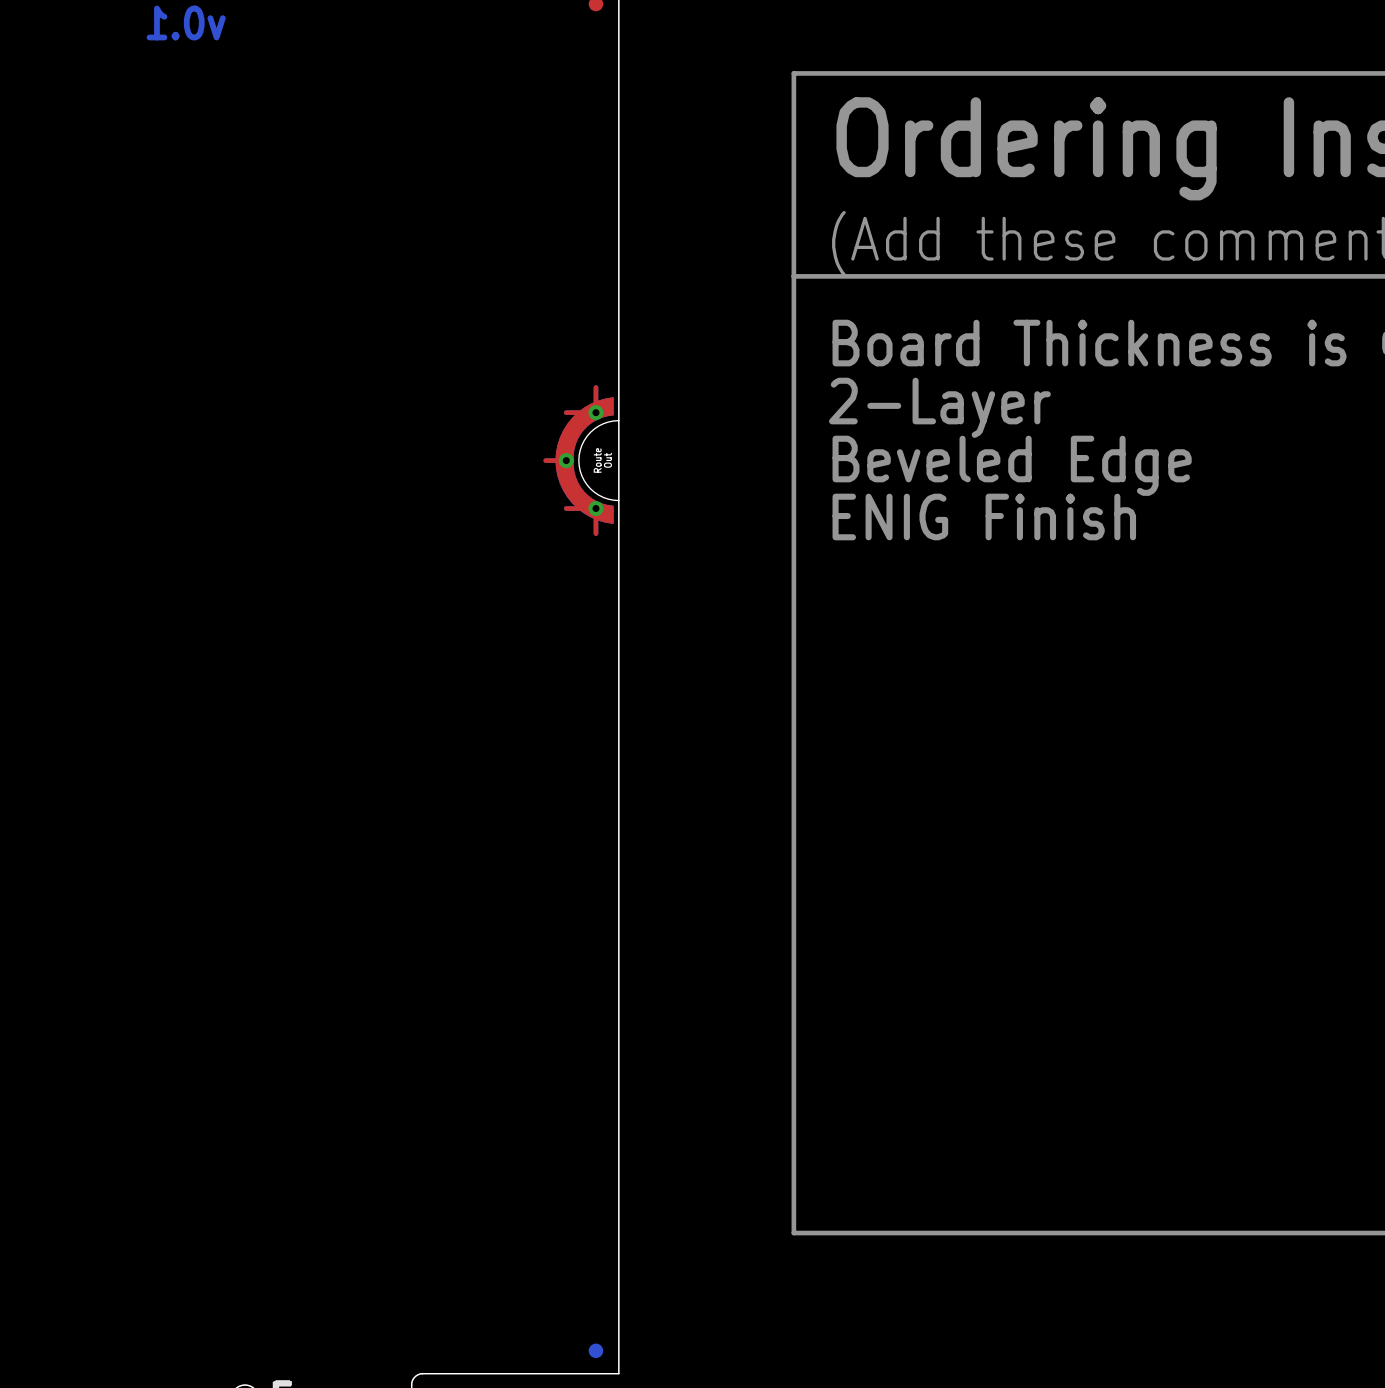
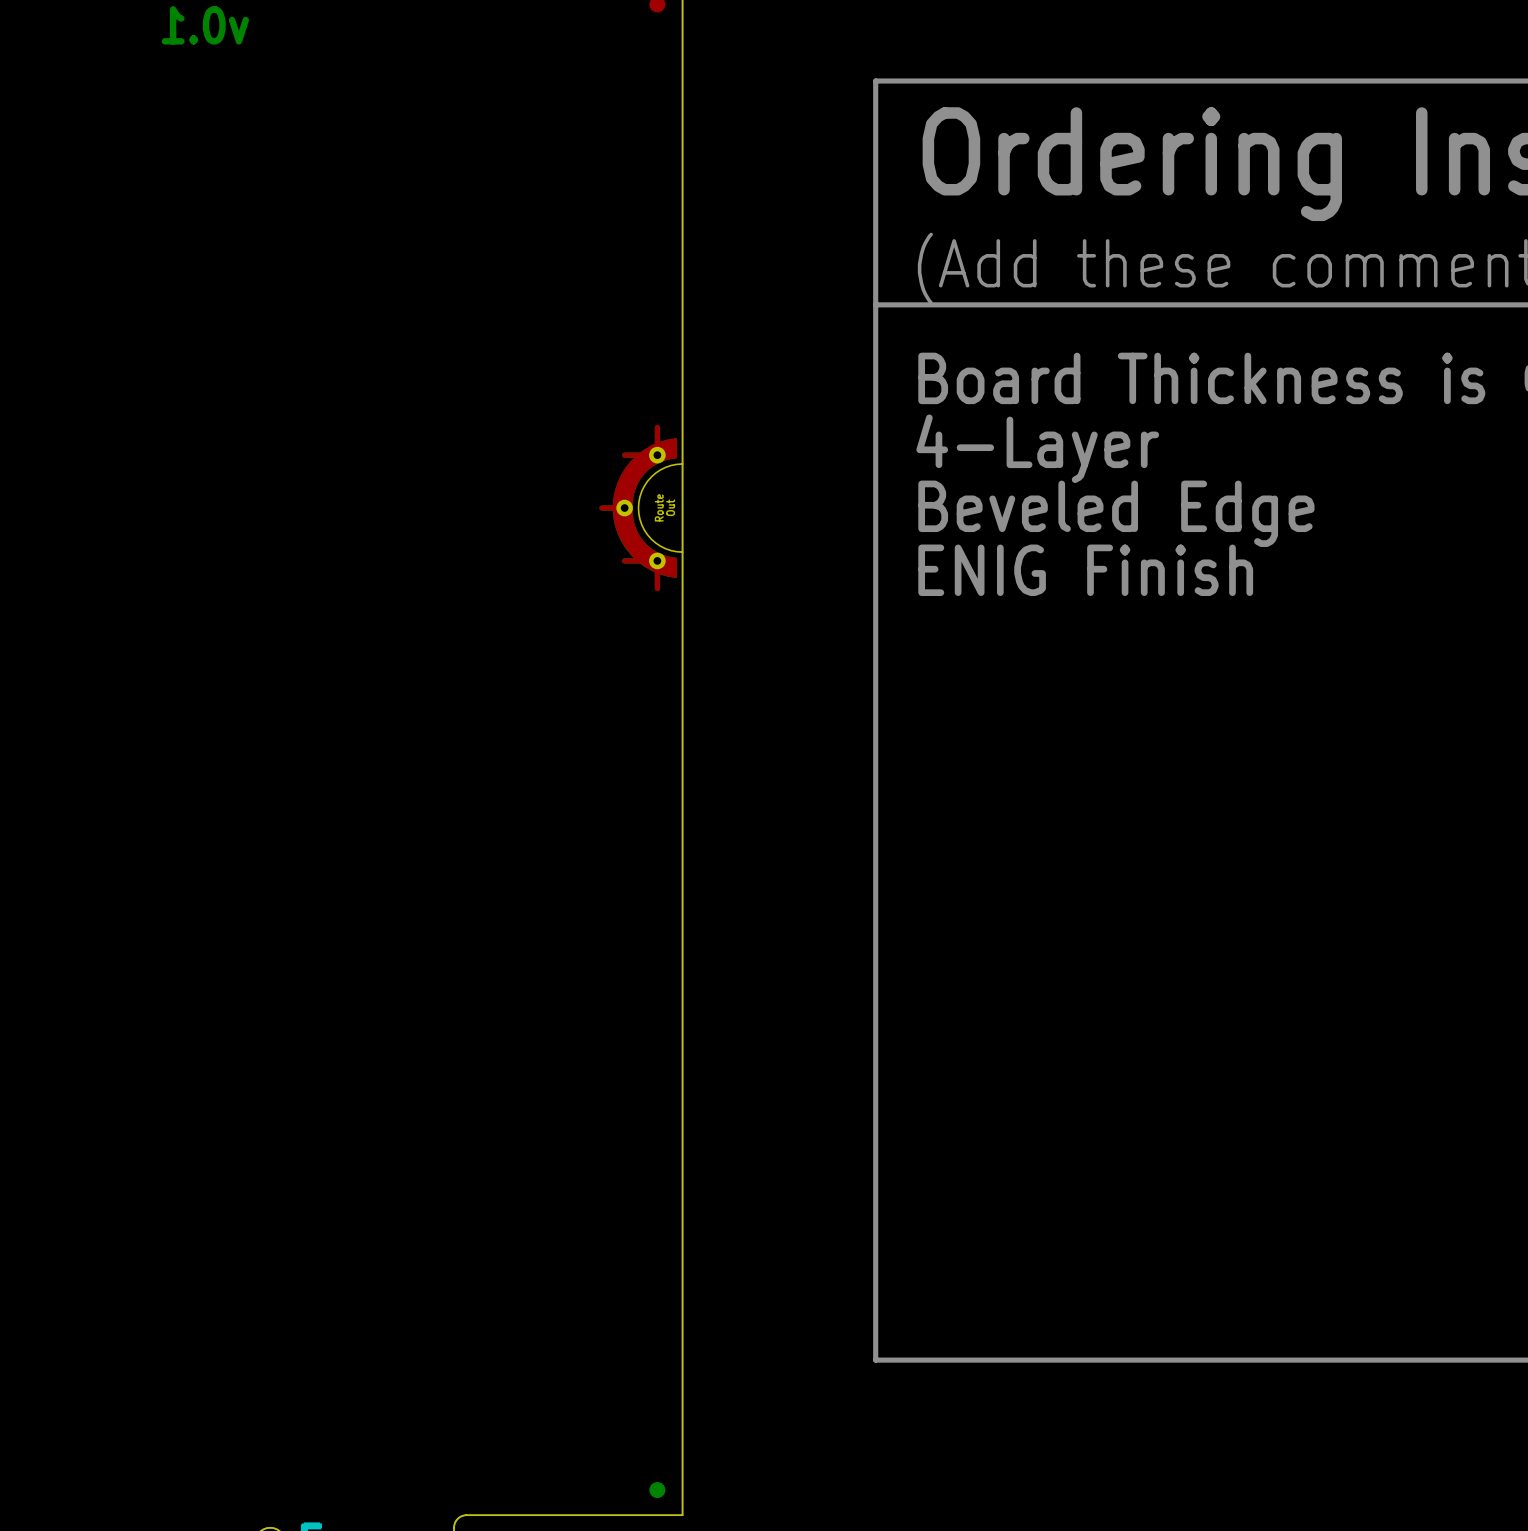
text: 2-Layer (939, 407) -> 4-Layer (1037, 448)

